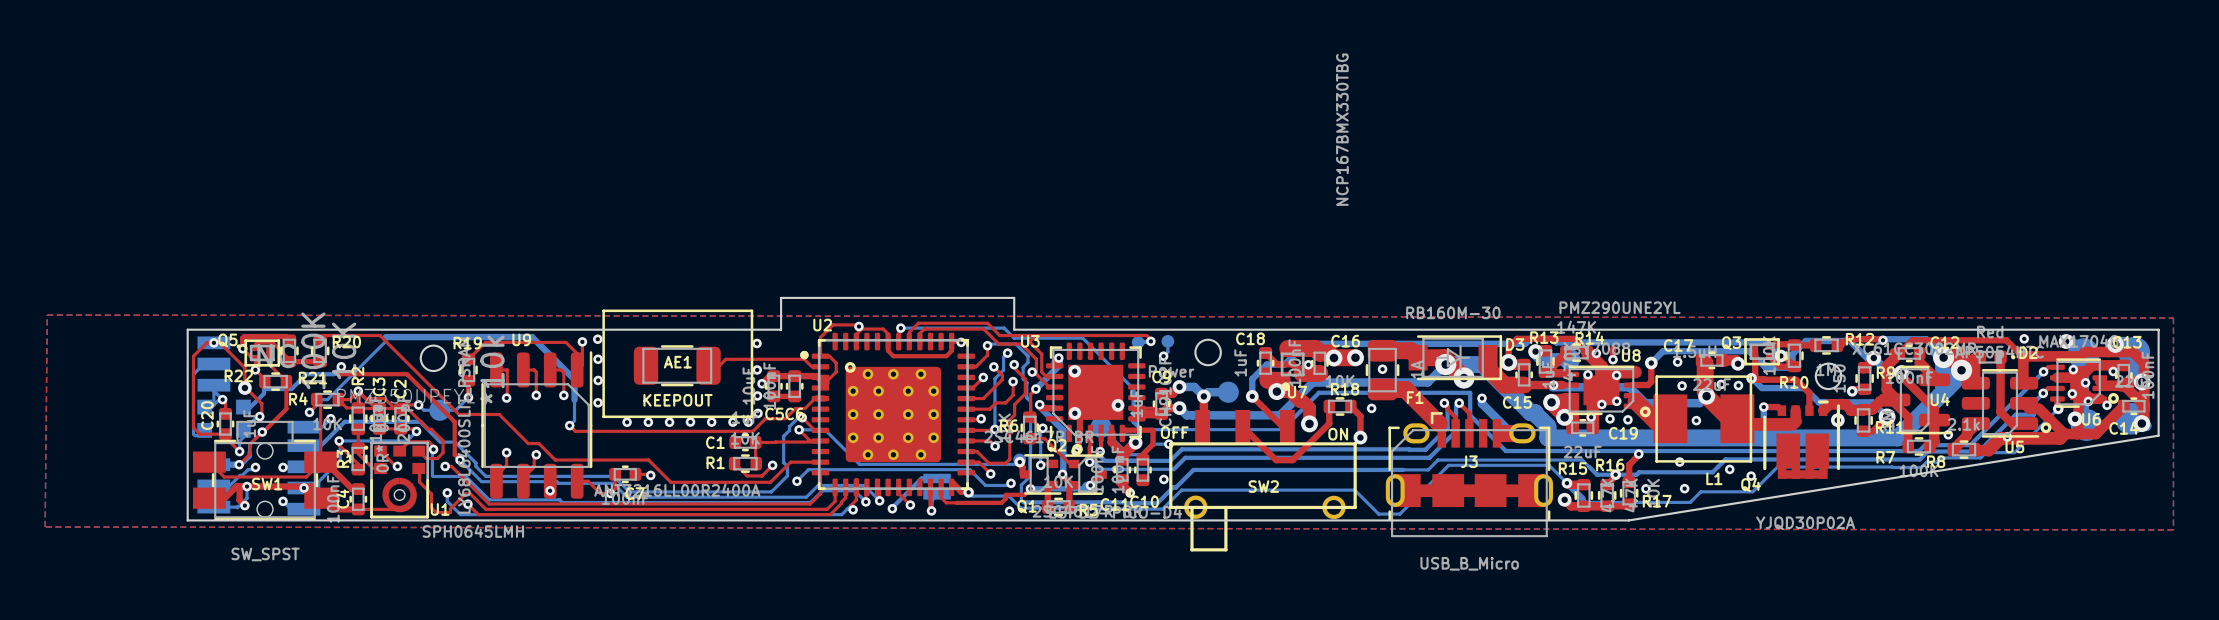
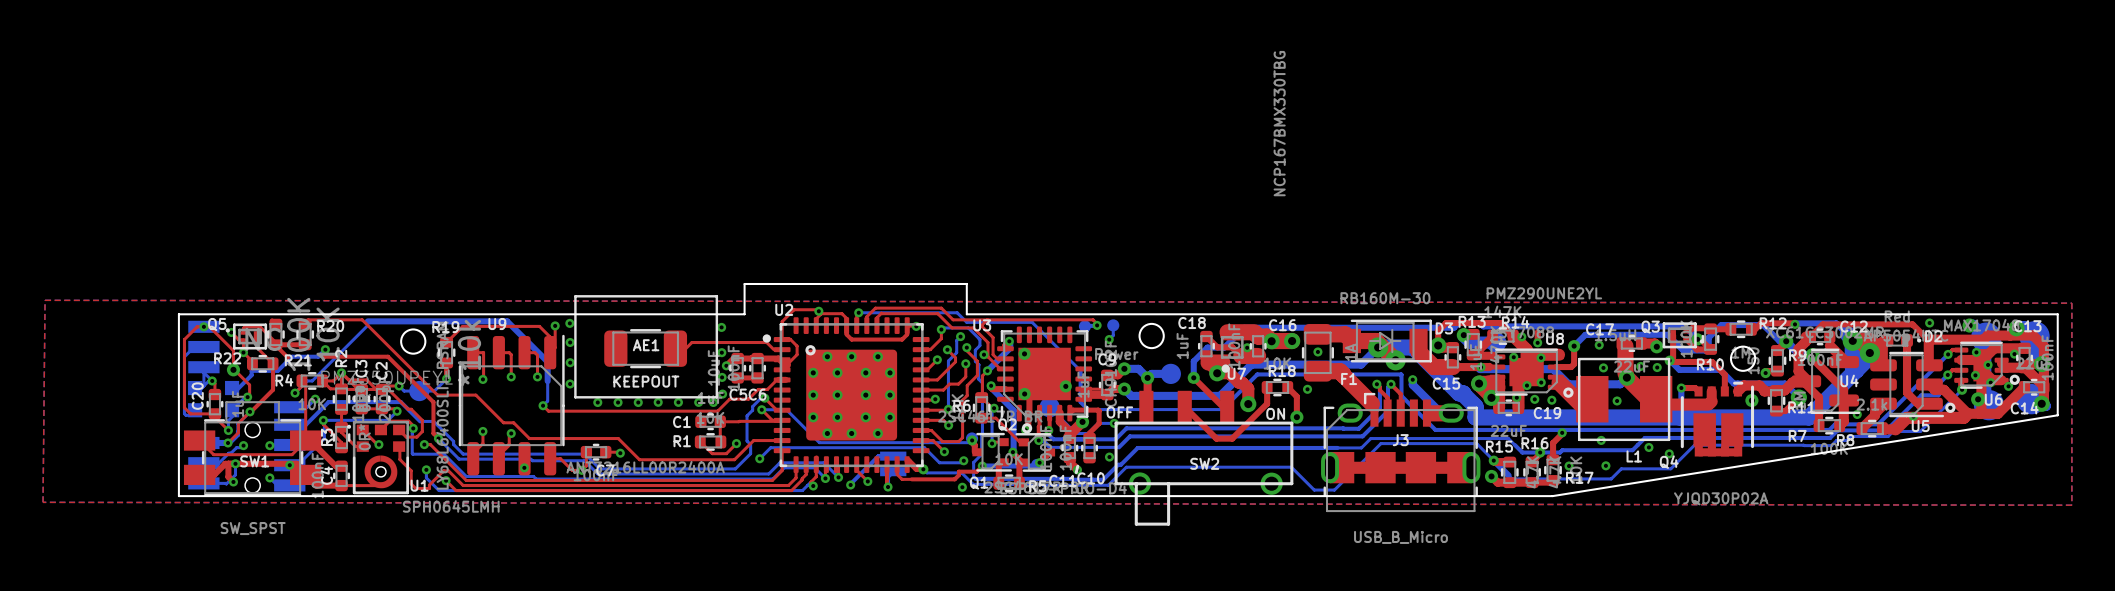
top track: (289, 340) (285, 336) (244, 336) (242, 348) -> none
top track: none -> (275, 345) (288, 357)

